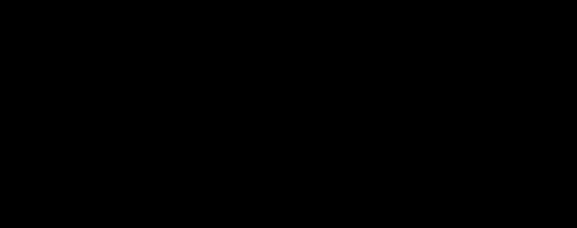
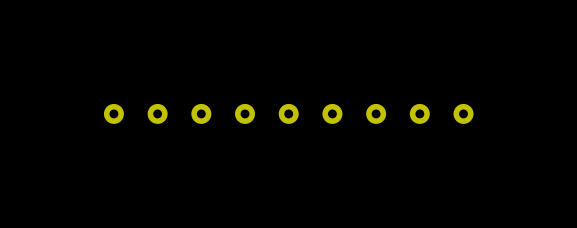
part: none -> (113, 113)
part: none -> (157, 113)
part: none -> (201, 113)
part: none -> (245, 113)
part: none -> (288, 113)
part: none -> (332, 113)
part: none -> (376, 113)
part: none -> (419, 113)
part: none -> (463, 113)

